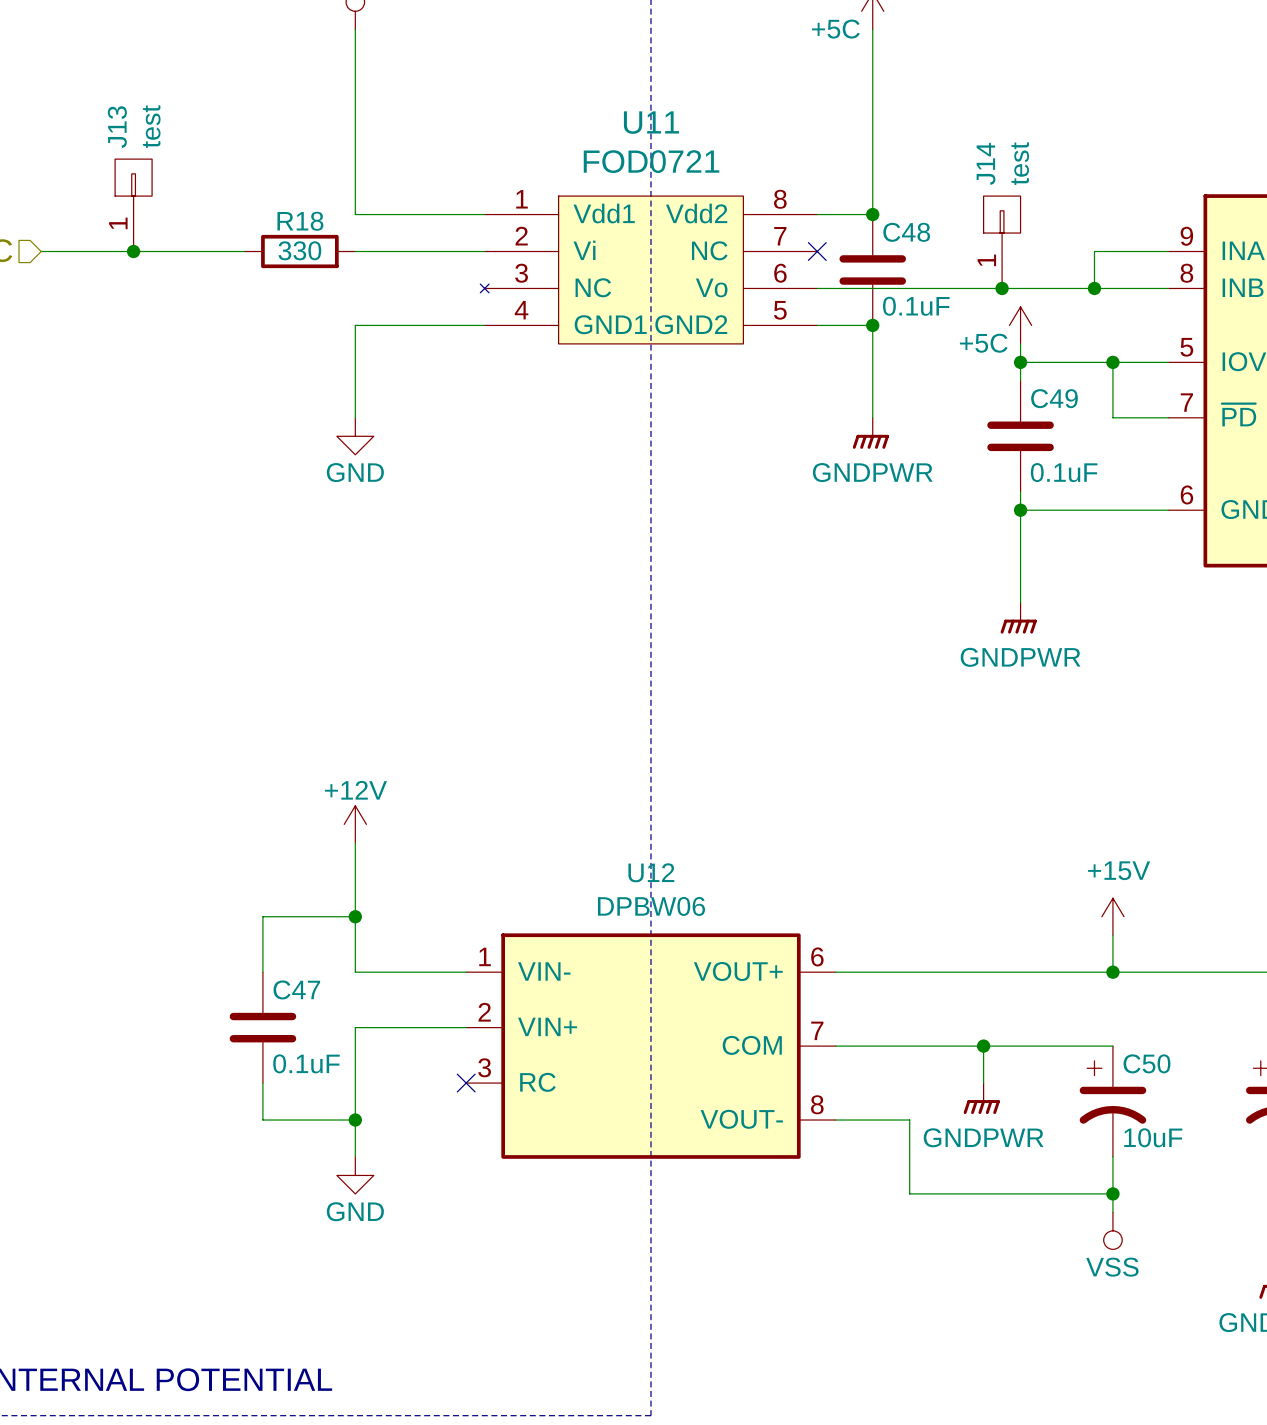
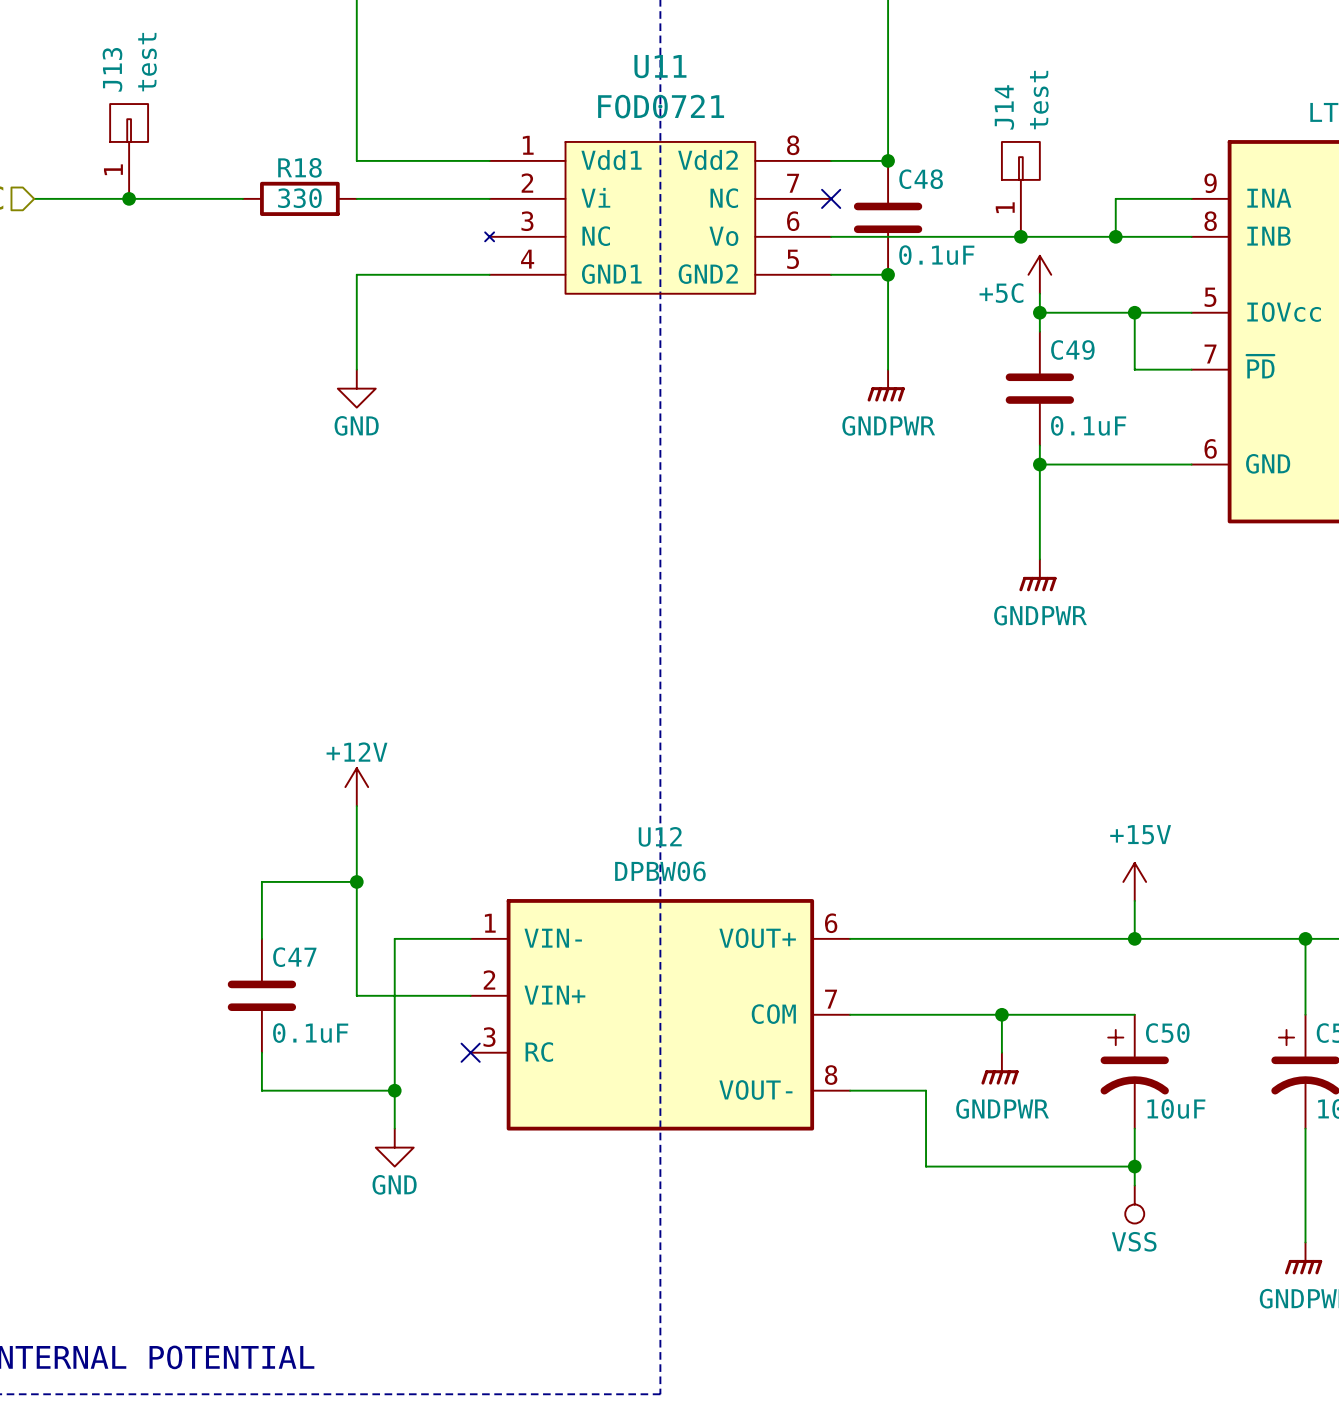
wire: (355, 972) (392, 972) -> (356, 938) (356, 995)
wire: none -> (394, 938) (394, 1128)
wire: (355, 1027) (355, 1156) -> none
wire: none -> (356, 1090) (394, 1090)
junction position: (355, 1120) -> (394, 1090)
power symbol position: GND (355, 1175) -> GND (394, 1147)

